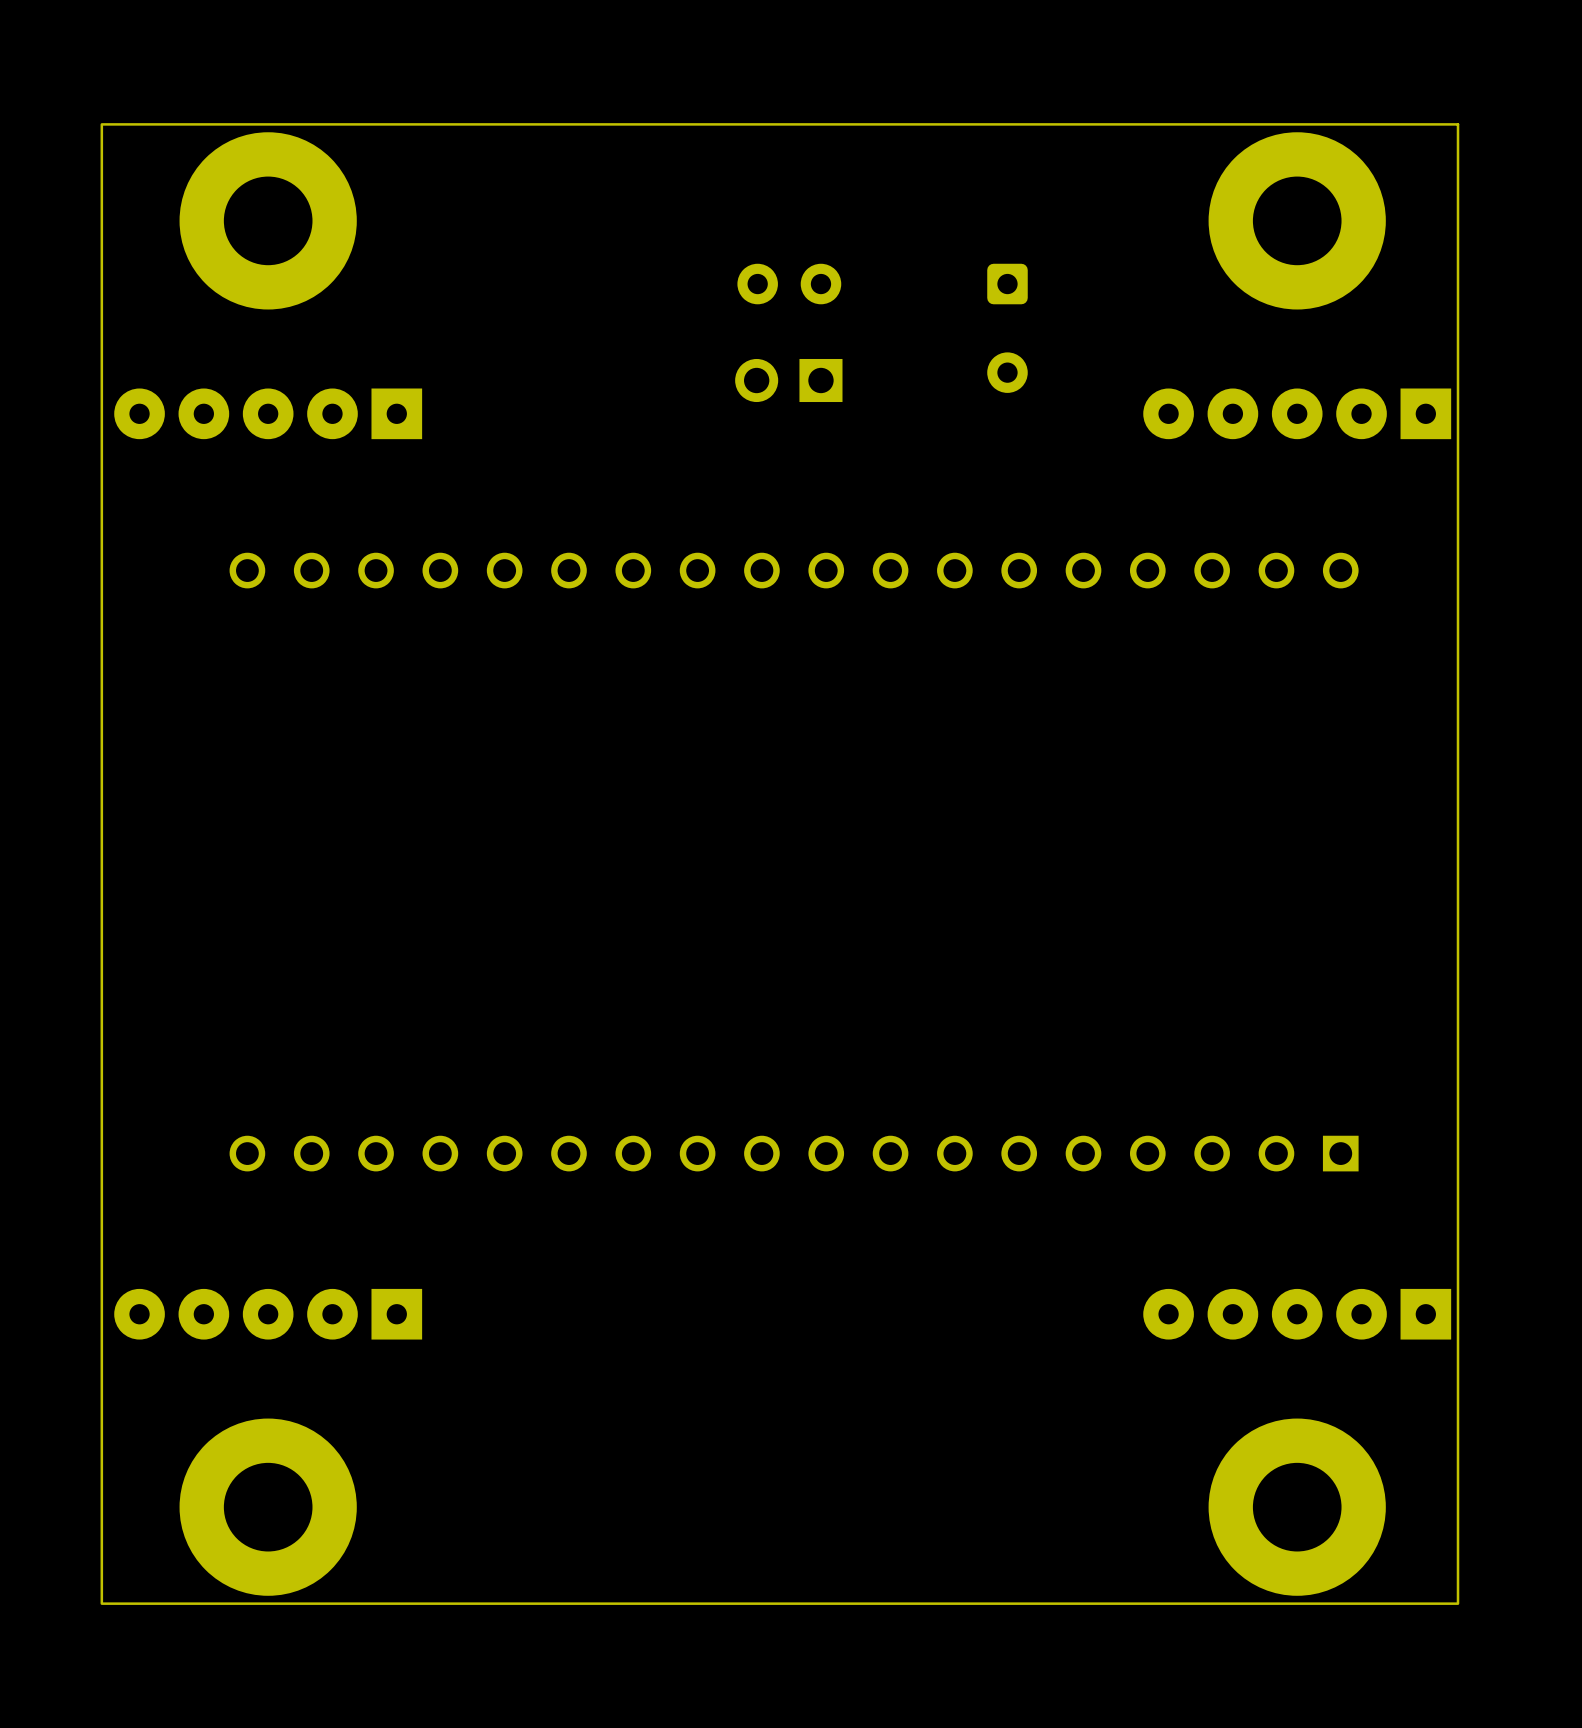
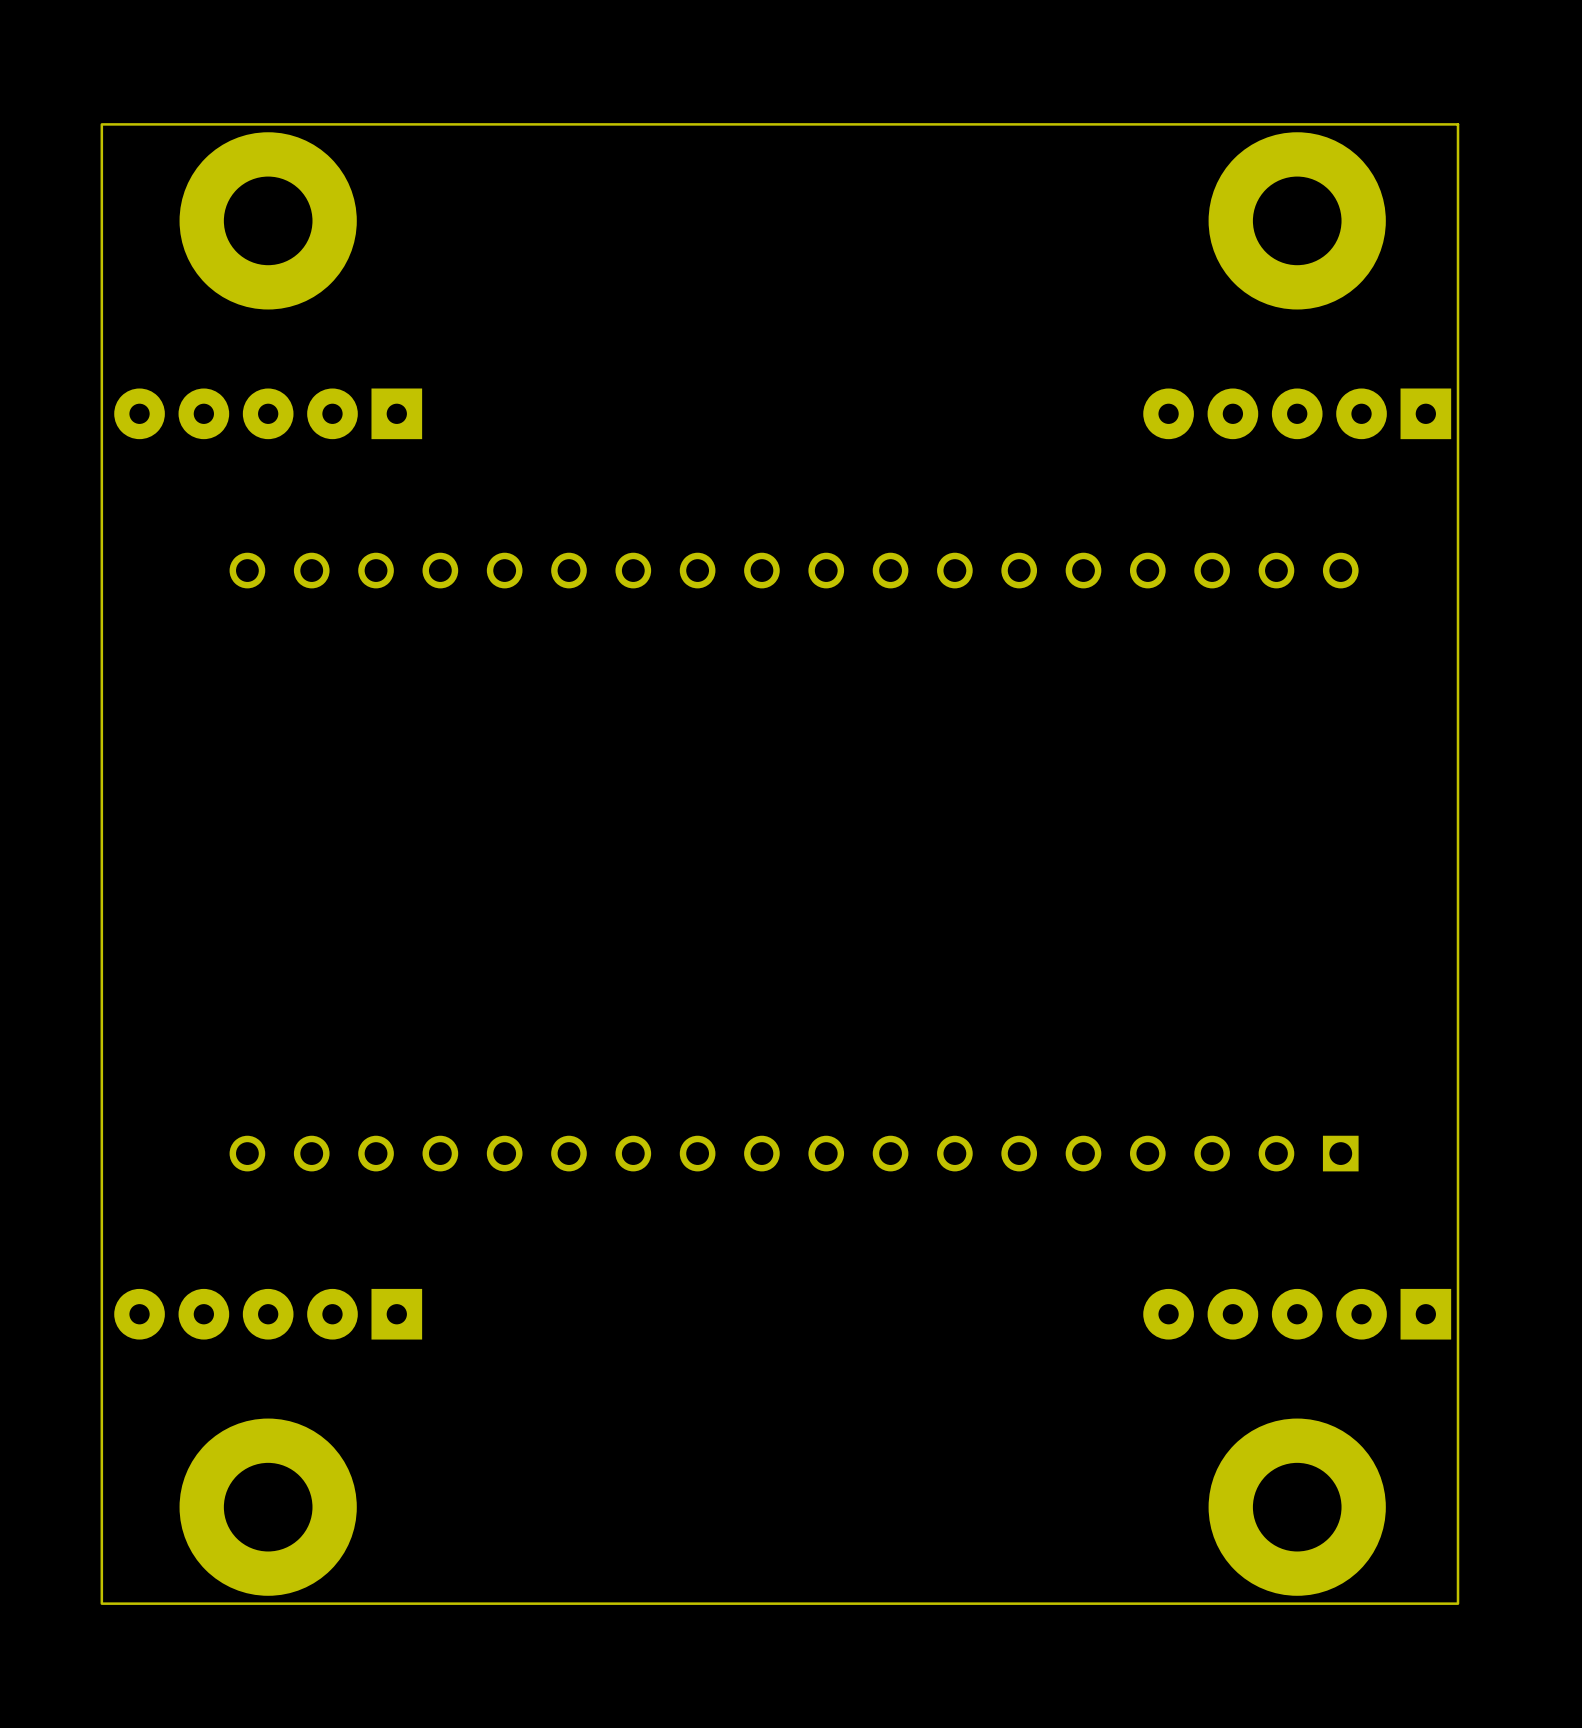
part: (789, 284) -> none
part: (1007, 328) -> none
part: (788, 380) -> none

